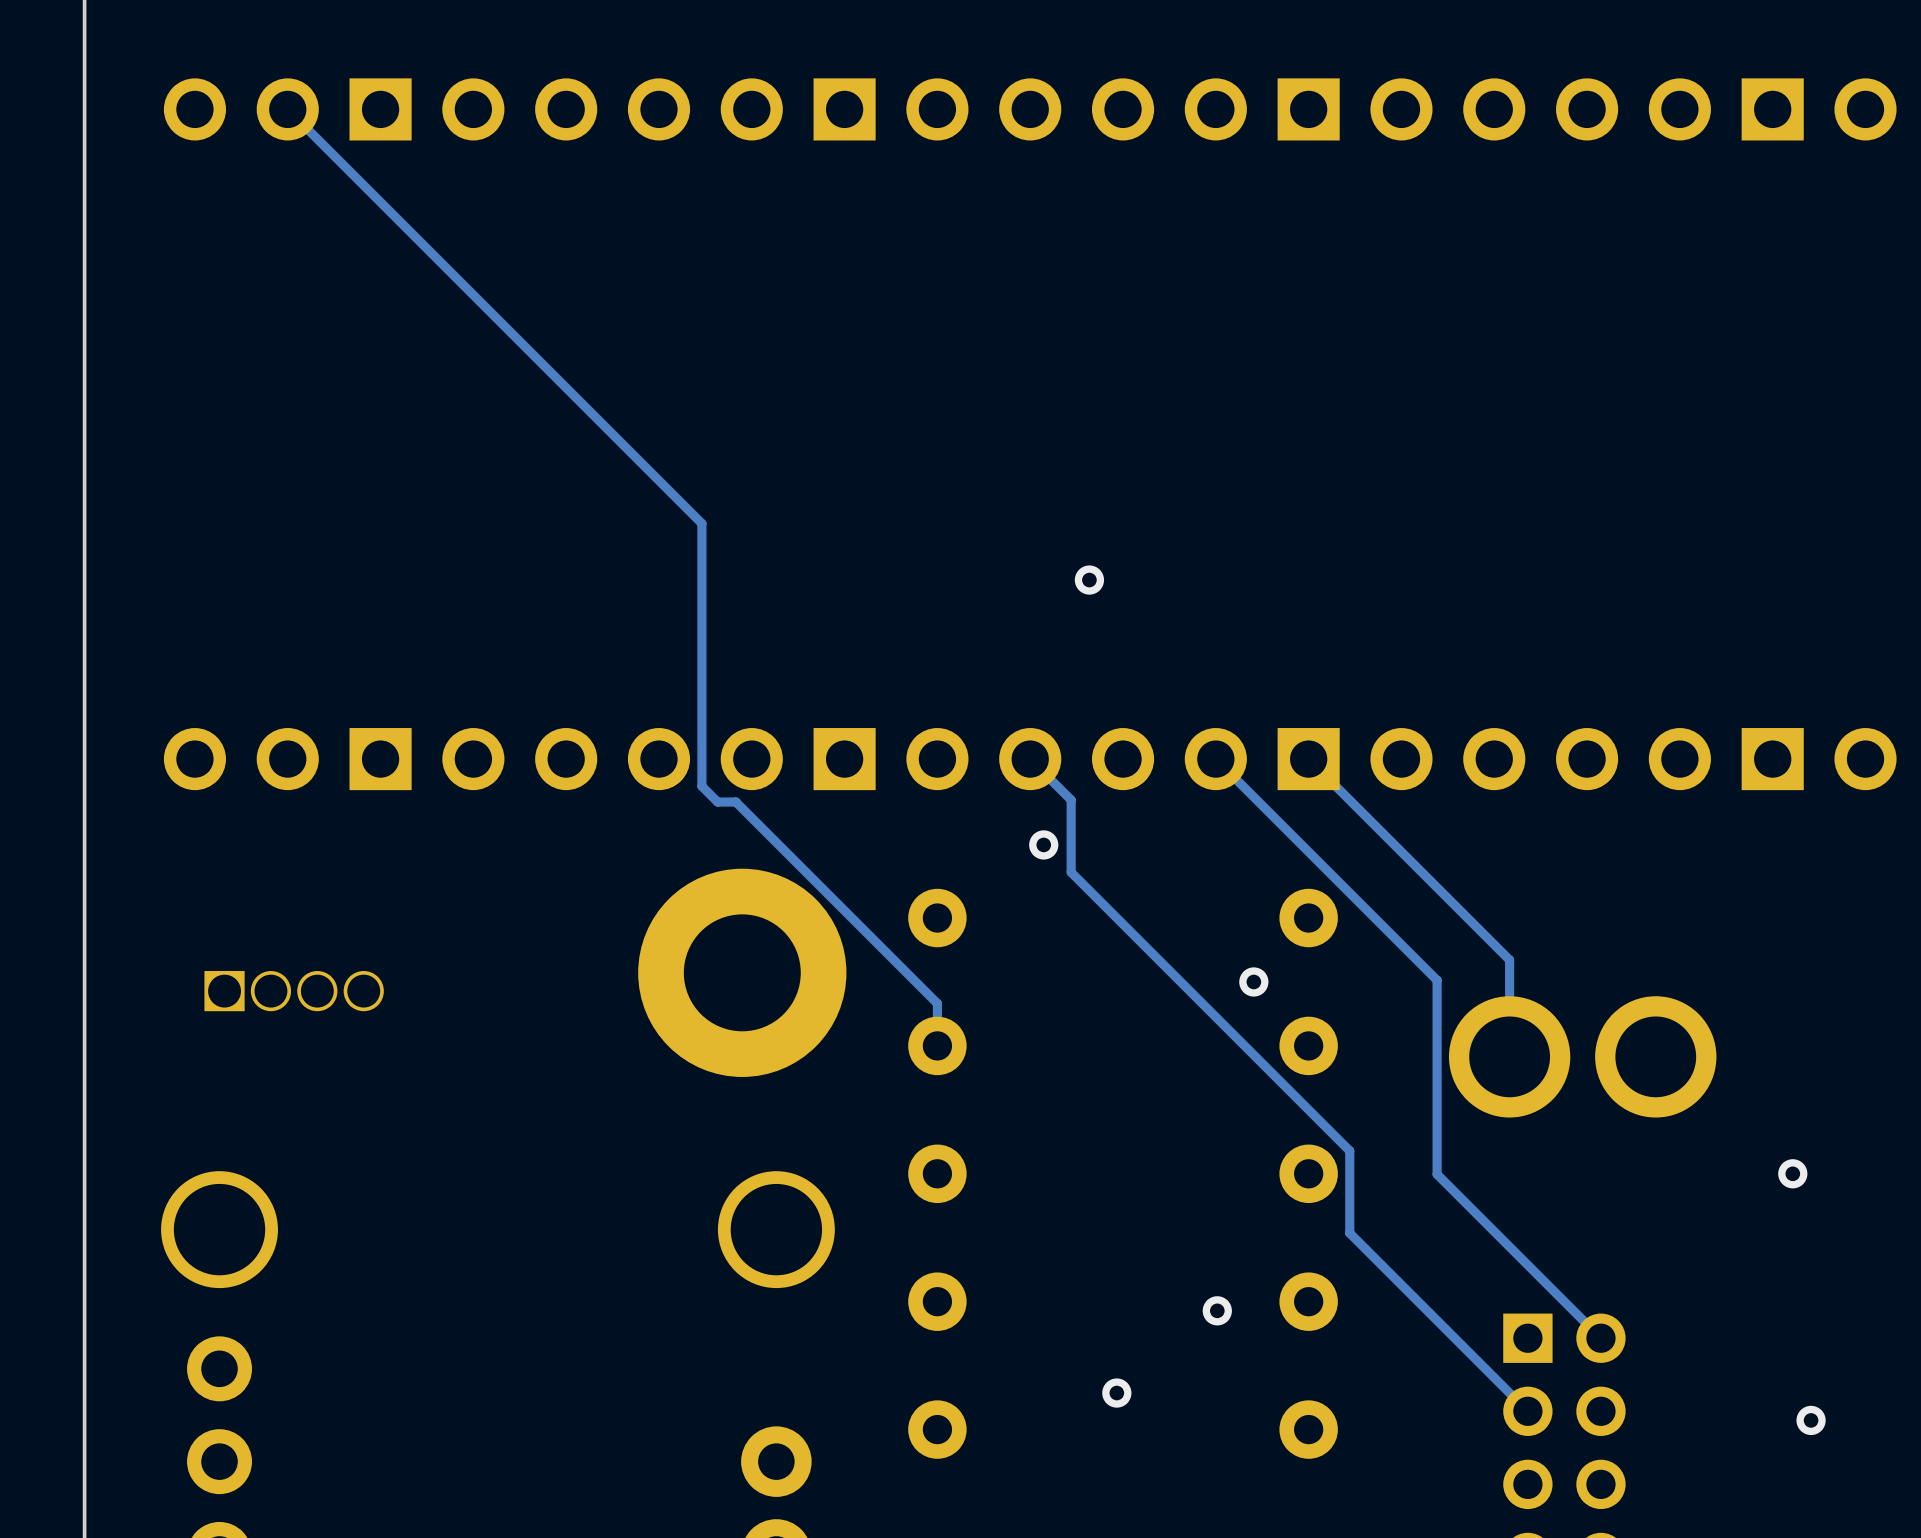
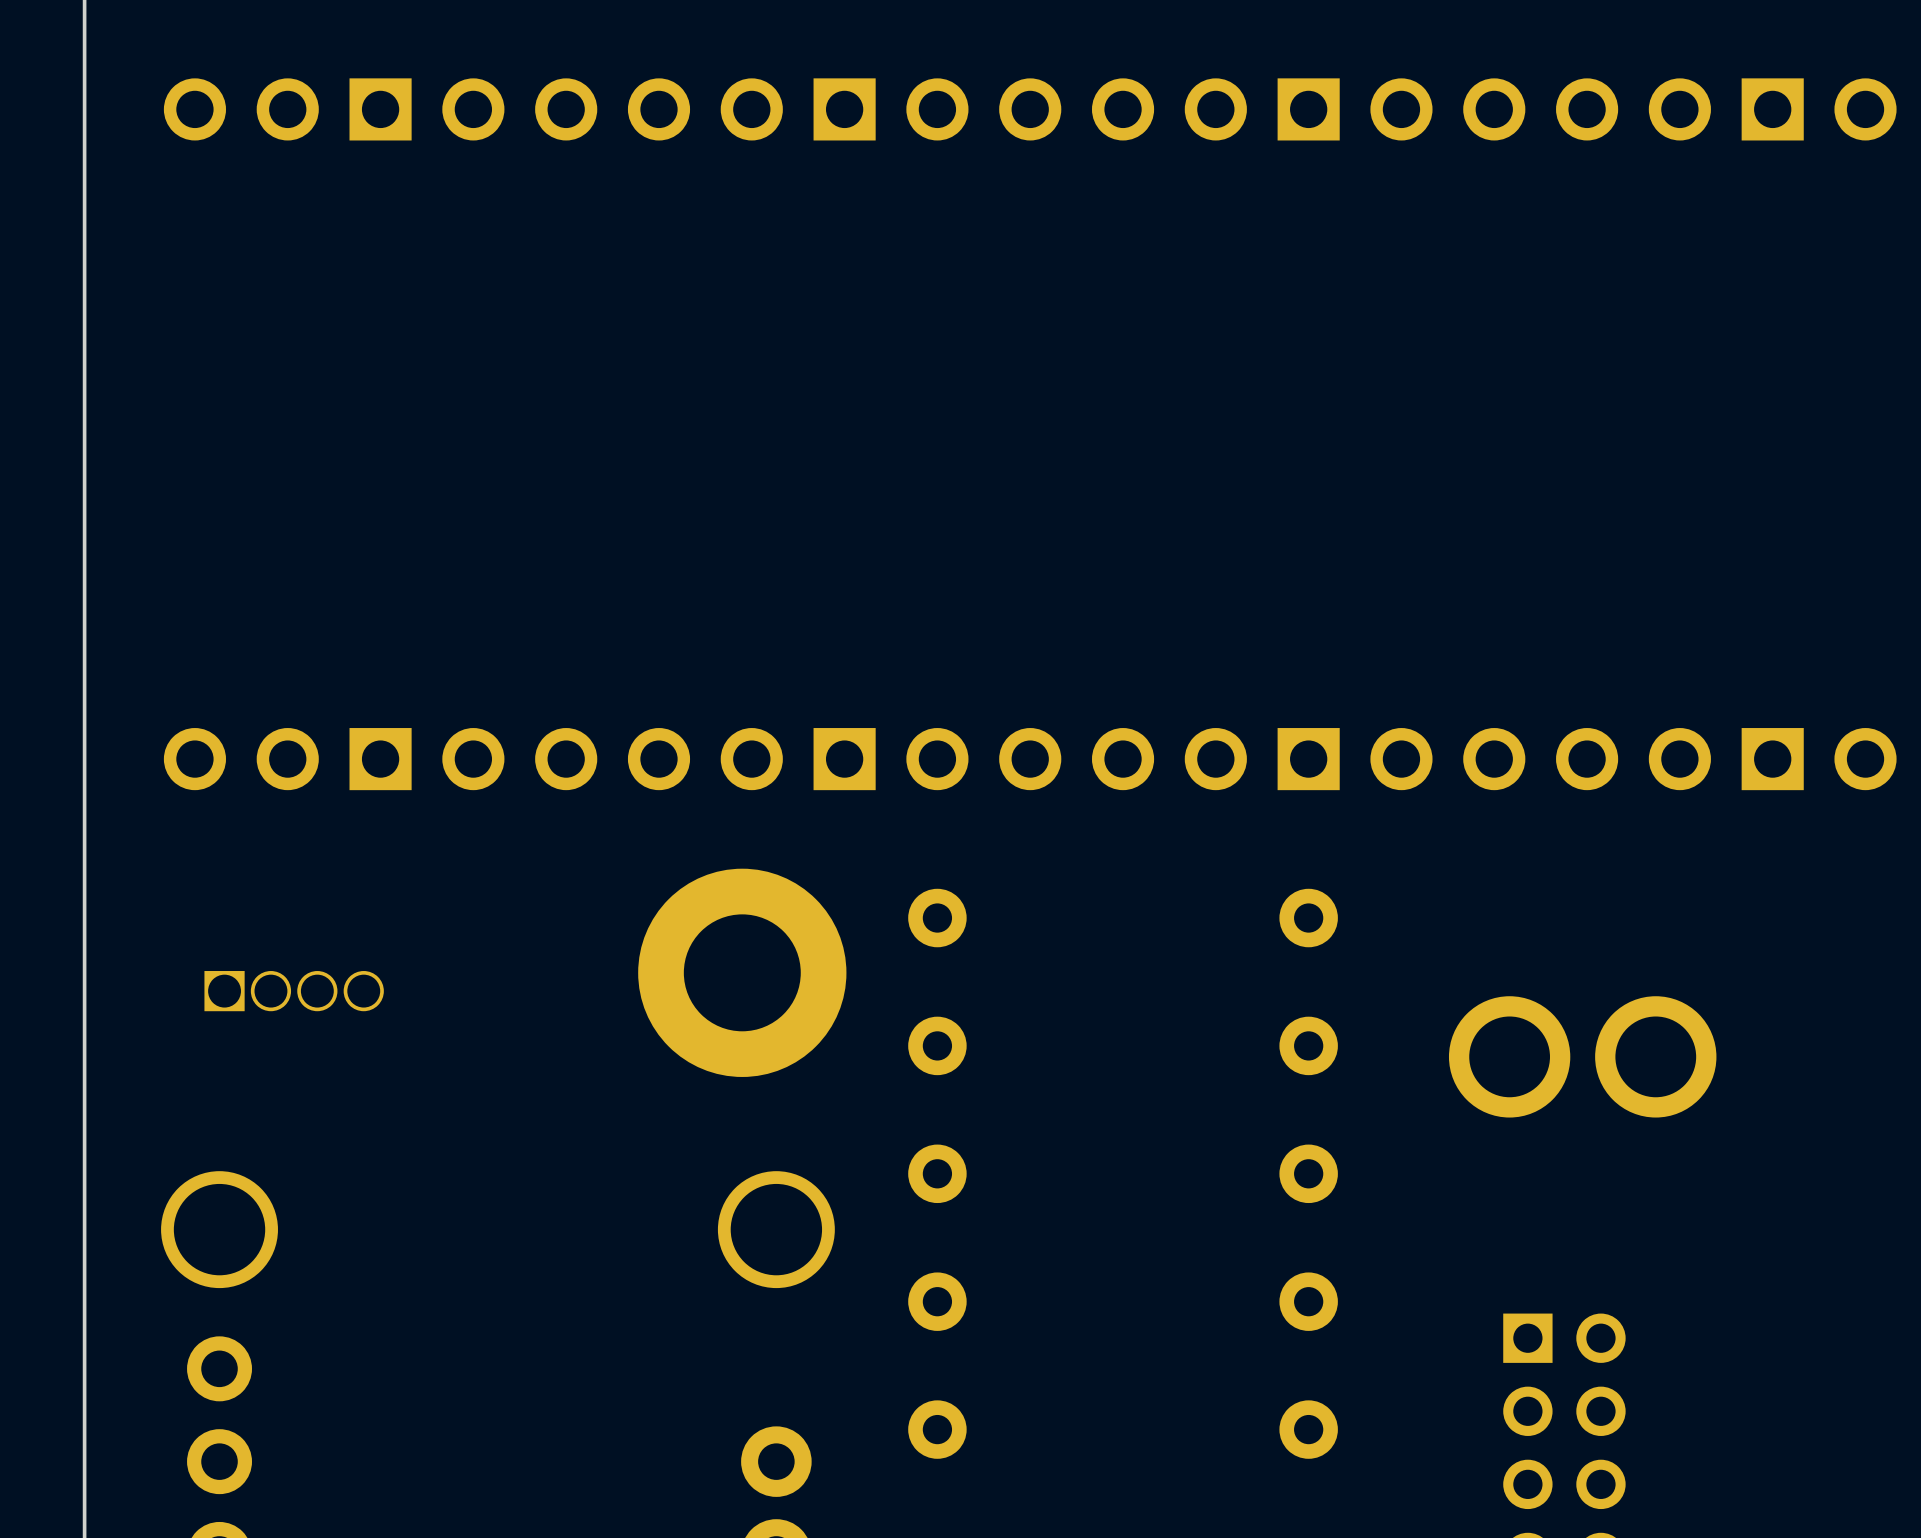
track: (287, 109) (701, 523) (701, 786) (717, 802) (735, 802) (937, 1003) (937, 1045) -> none
via: (1089, 580) -> none
track: (1030, 759) (1071, 800) (1071, 872) (1349, 1150) (1349, 1233) (1527, 1411) -> none
track: (1215, 759) (1437, 980) (1437, 1174) (1600, 1338) -> none
track: (1308, 759) (1509, 960) (1509, 1056) -> none
via: (1043, 844) -> none
via: (1253, 981) -> none
via: (1792, 1173) -> none
via: (1217, 1310) -> none
via: (1116, 1393) -> none
via: (1811, 1420) -> none

